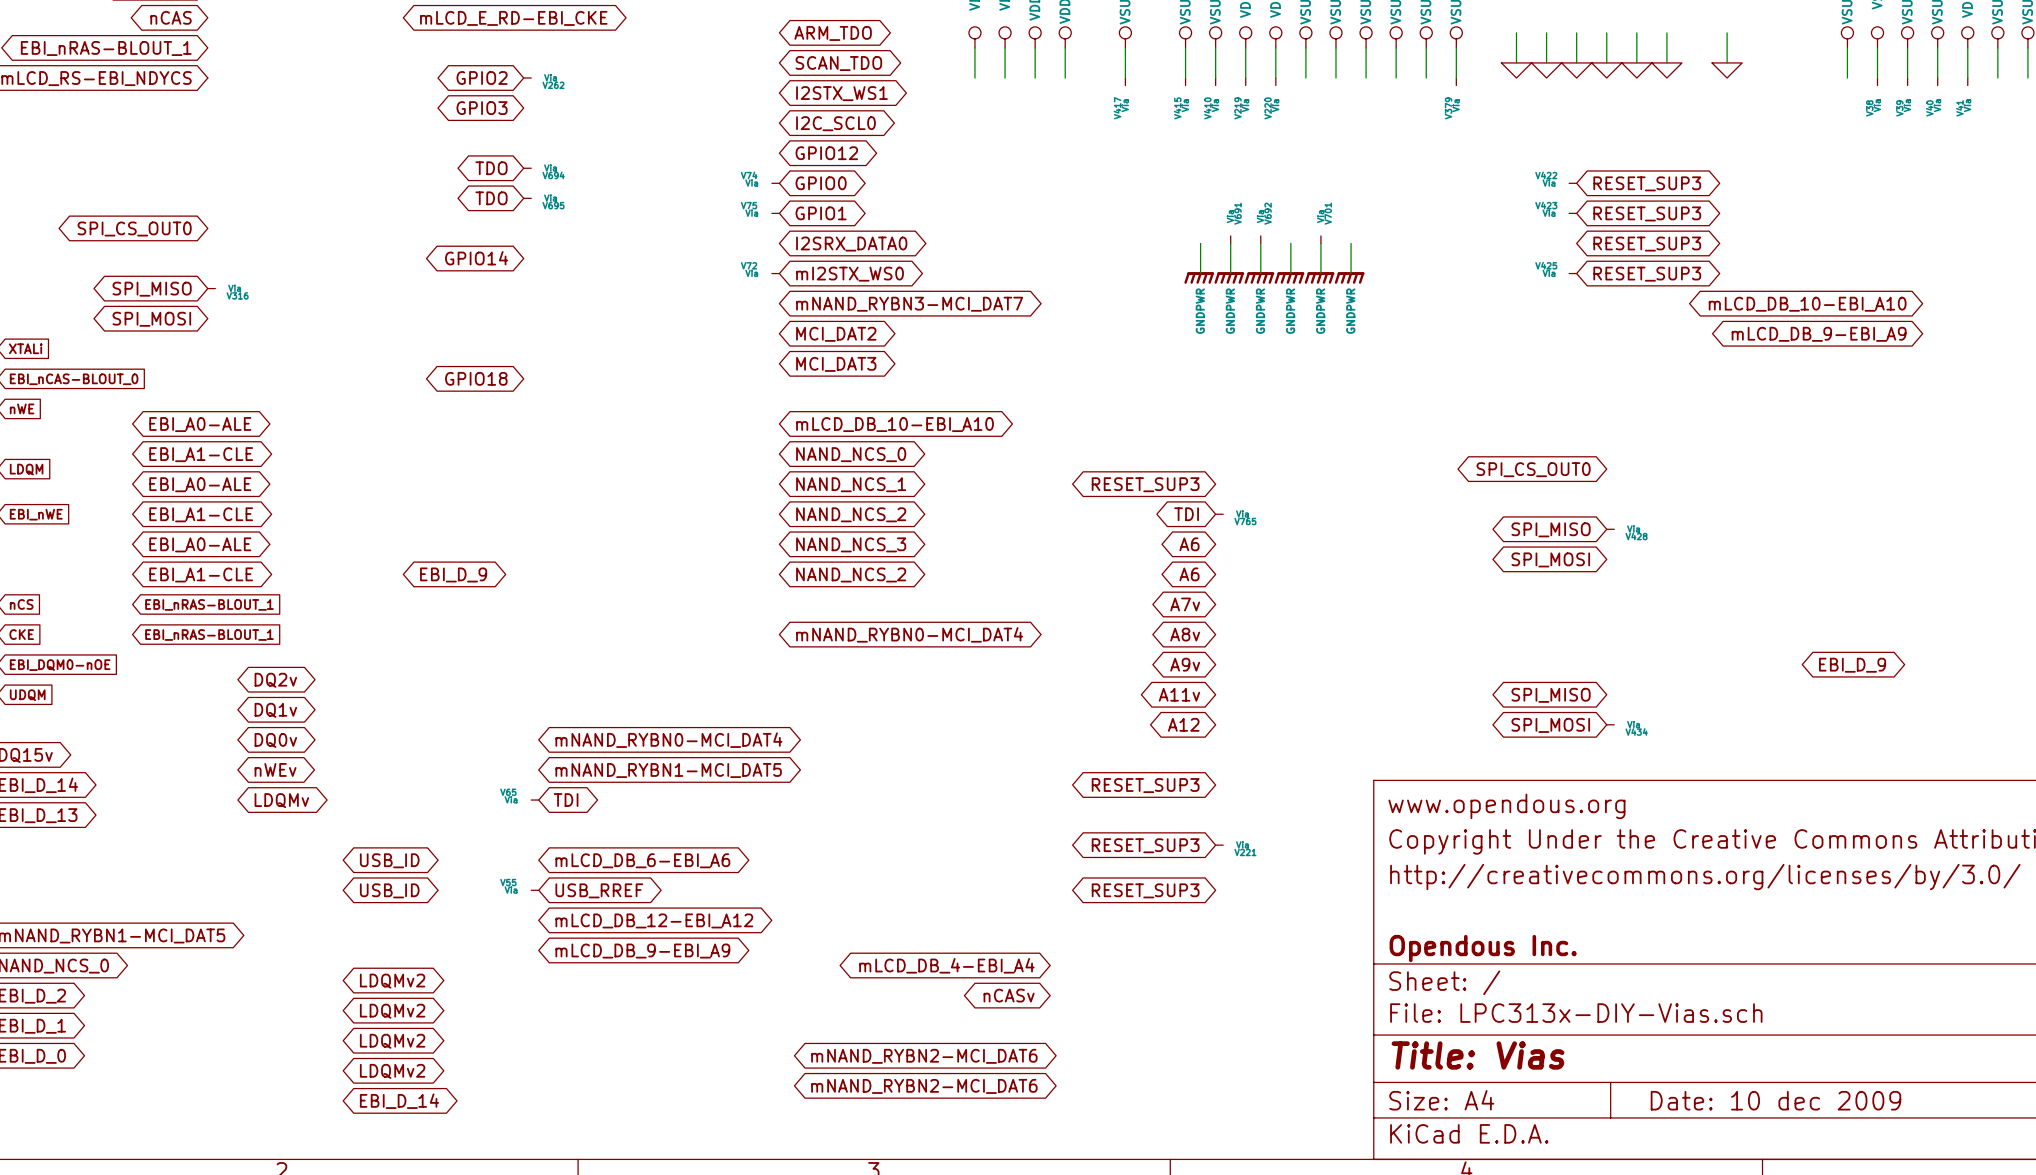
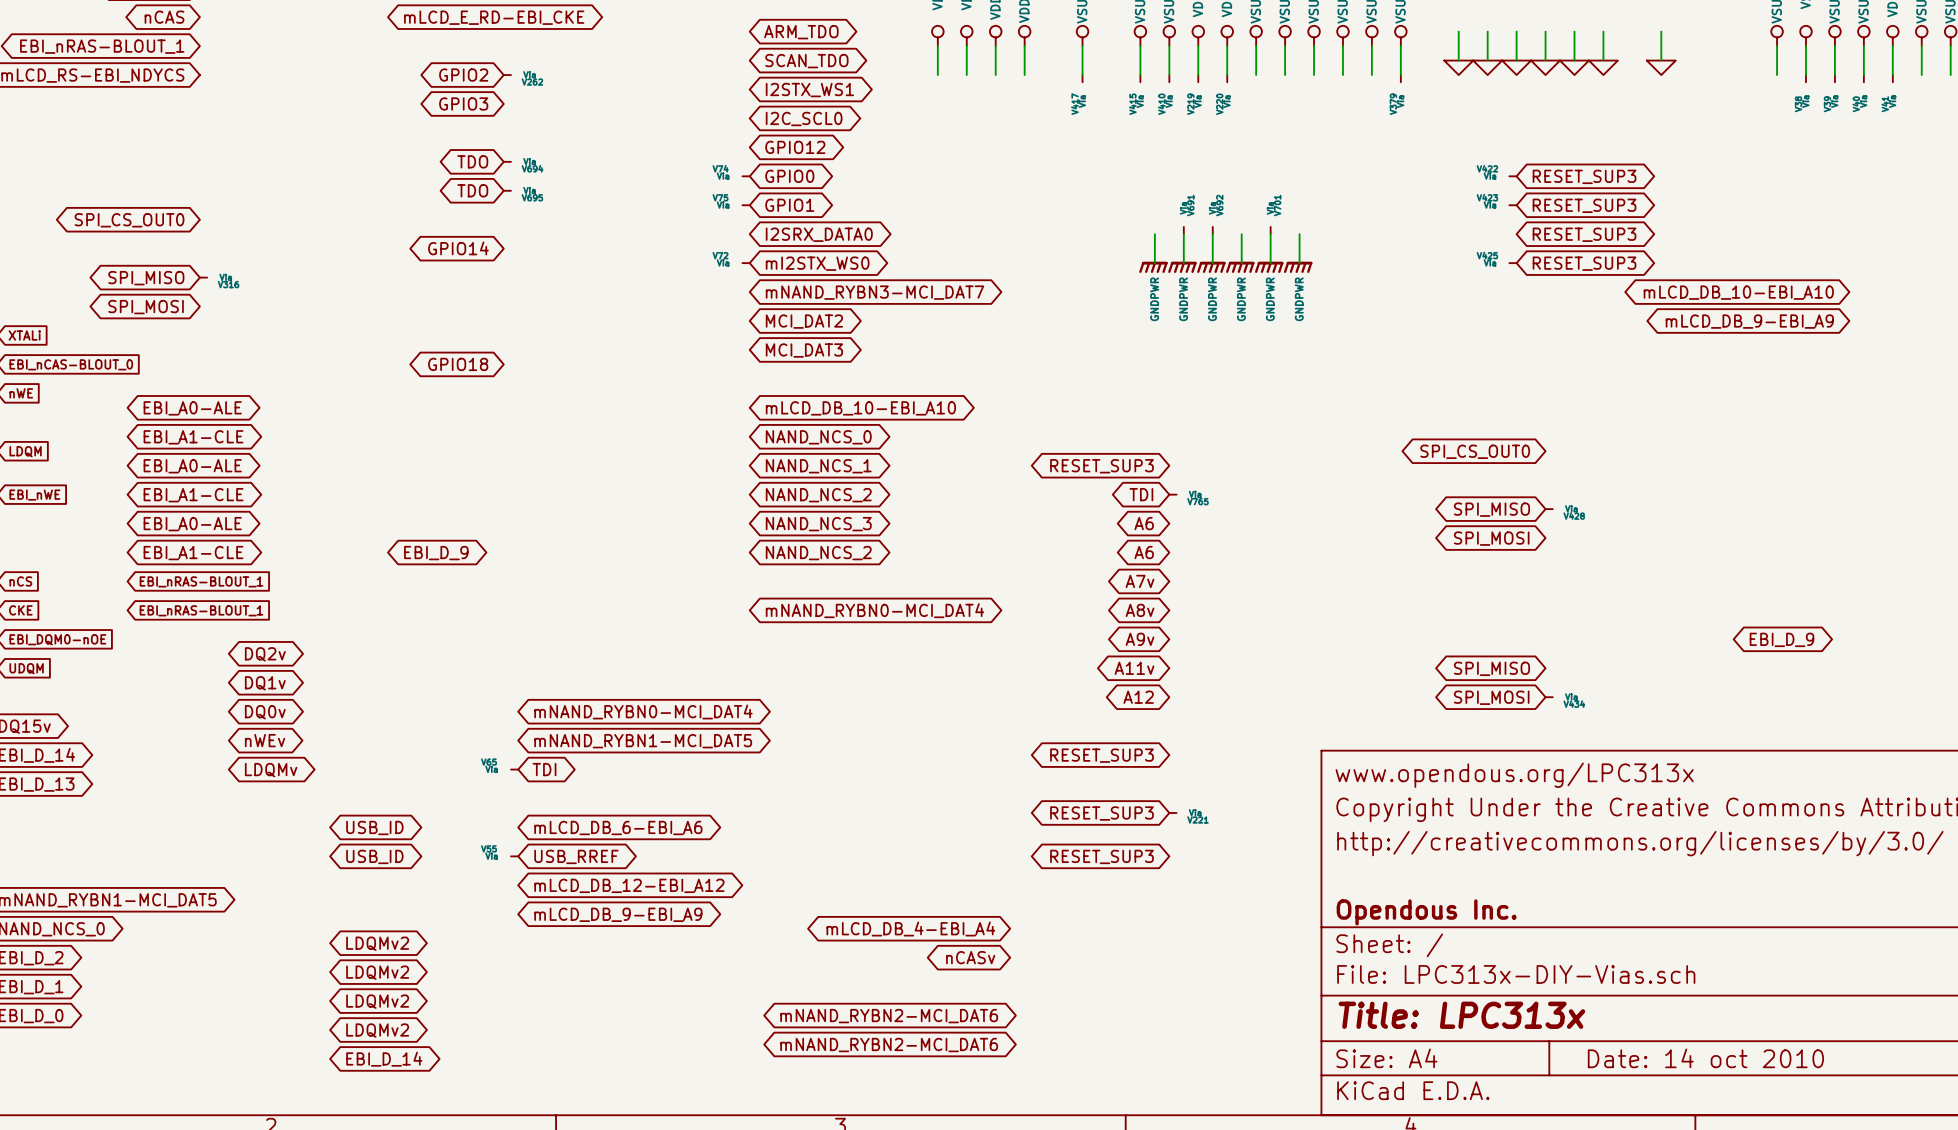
title block: www.opendous.org (1506, 806) -> www.opendous.org/LPC313x (1514, 775)
title block: Title: Vias (1477, 1055) -> Title: LPC313x (1461, 1015)
title block: Date: 10 dec 2009 (1775, 1100) -> Date: 14 oct 2010 (1705, 1058)

